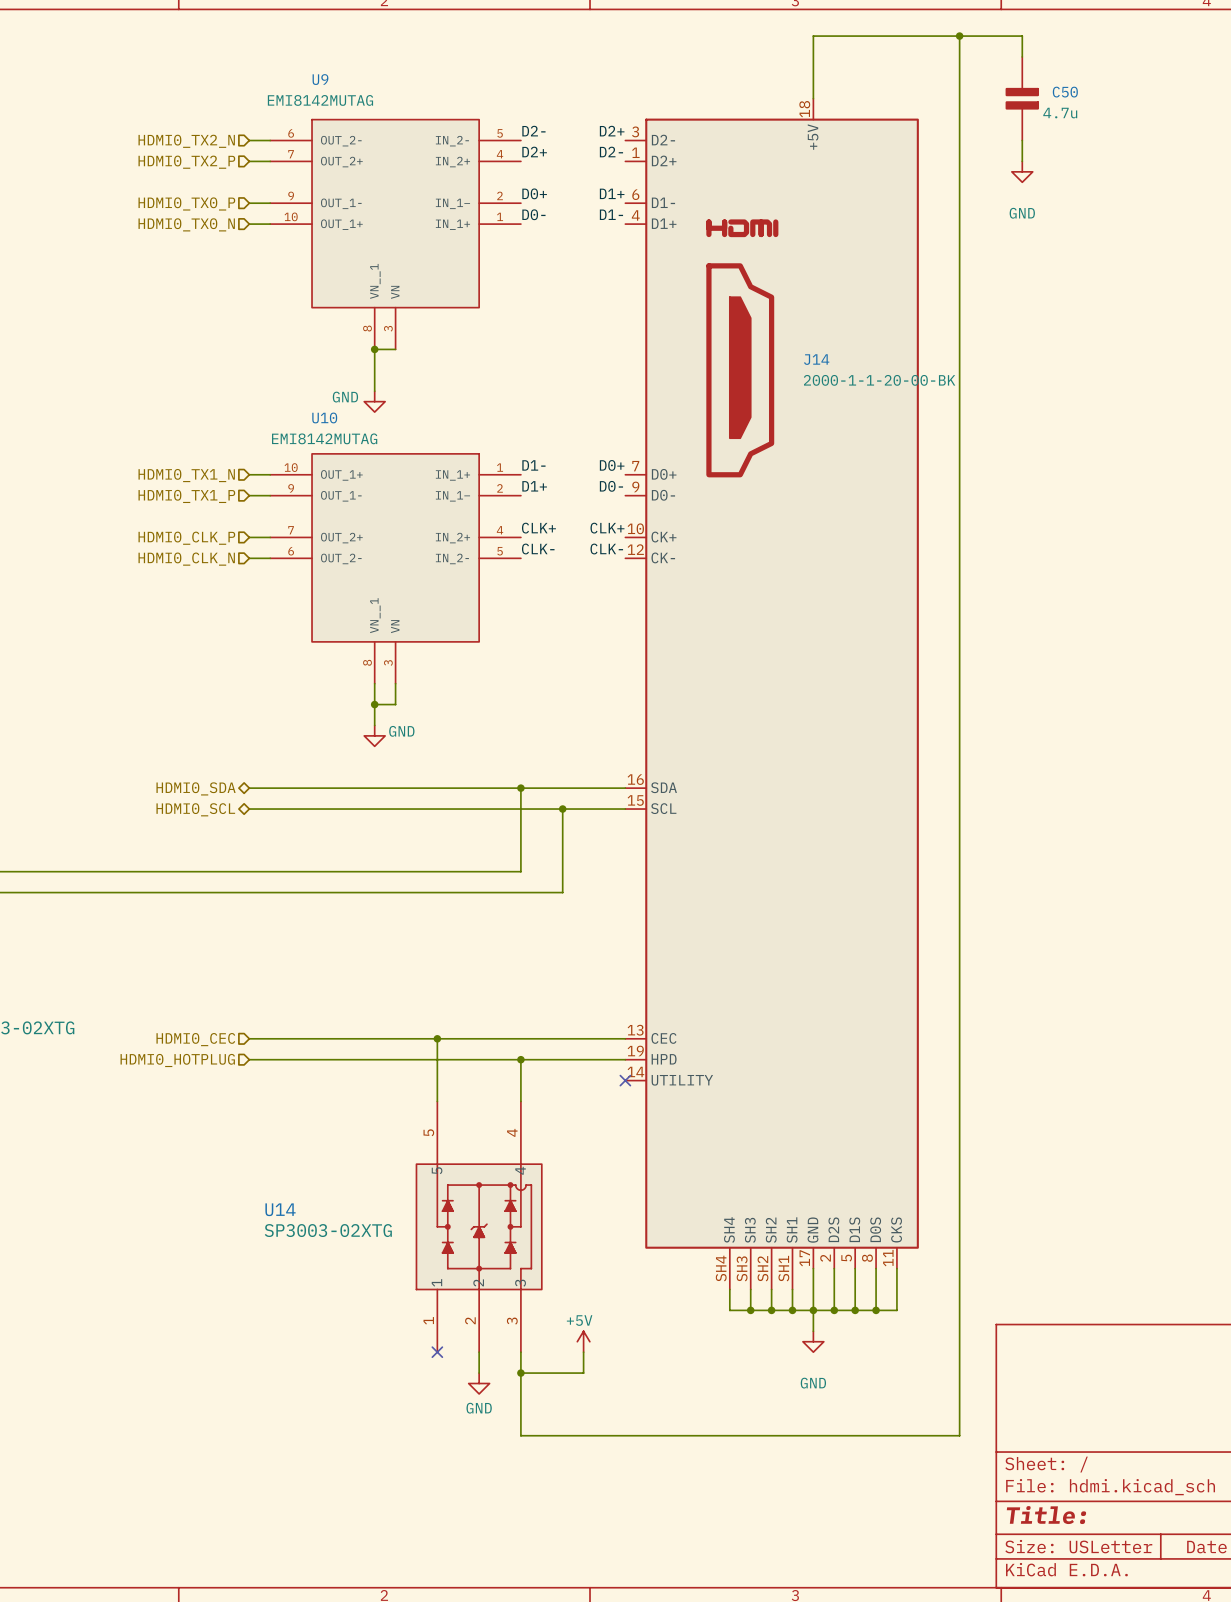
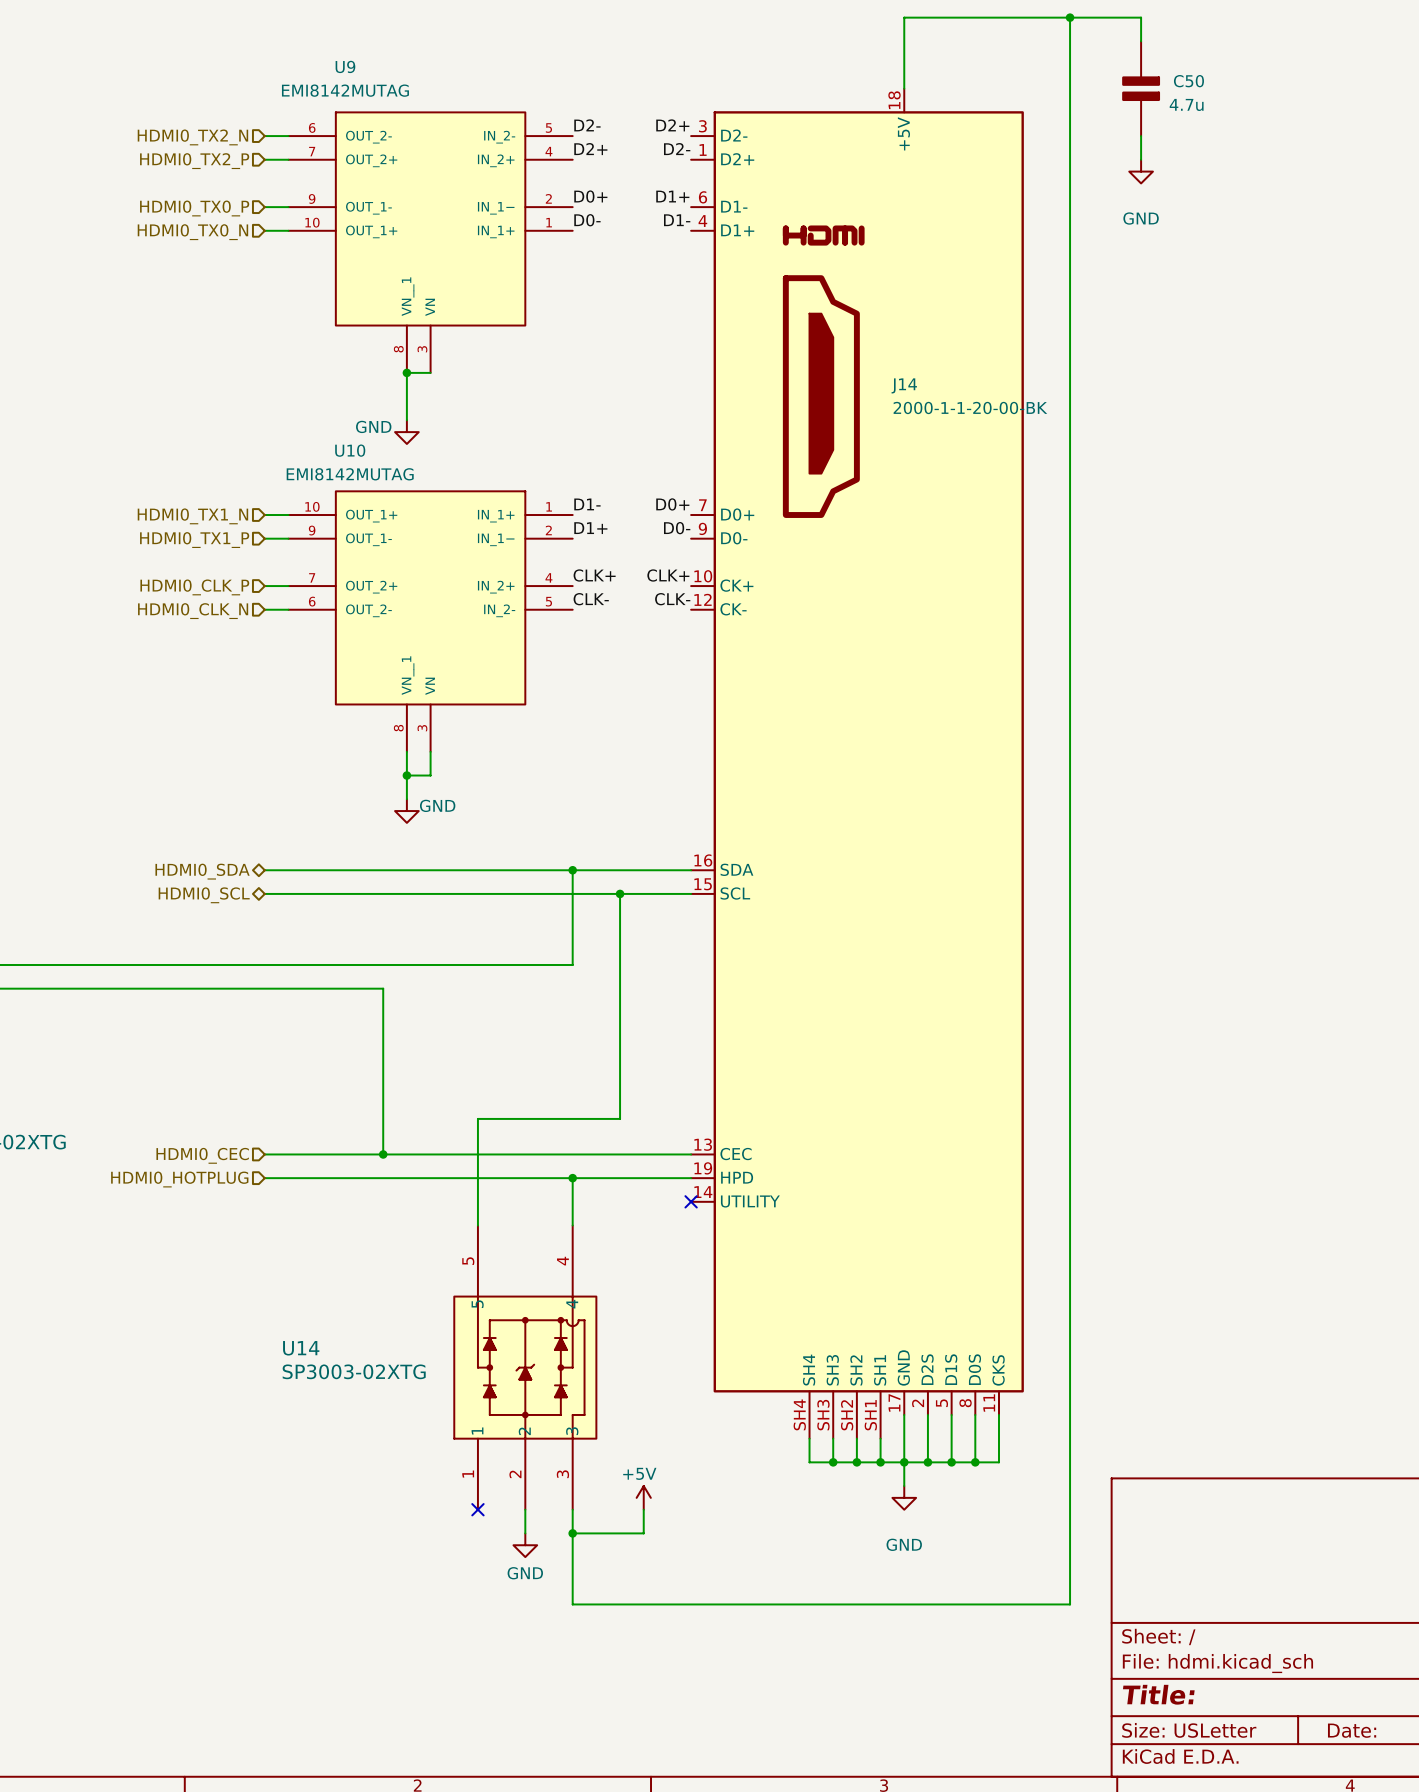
wire: (353, 892) (562, 892) -> (477, 1154) (477, 1118) (620, 1118) (620, 988)
wire: none -> (383, 988) (383, 1154)
junction: none -> (383, 1154)
junction: (437, 1038) -> none

